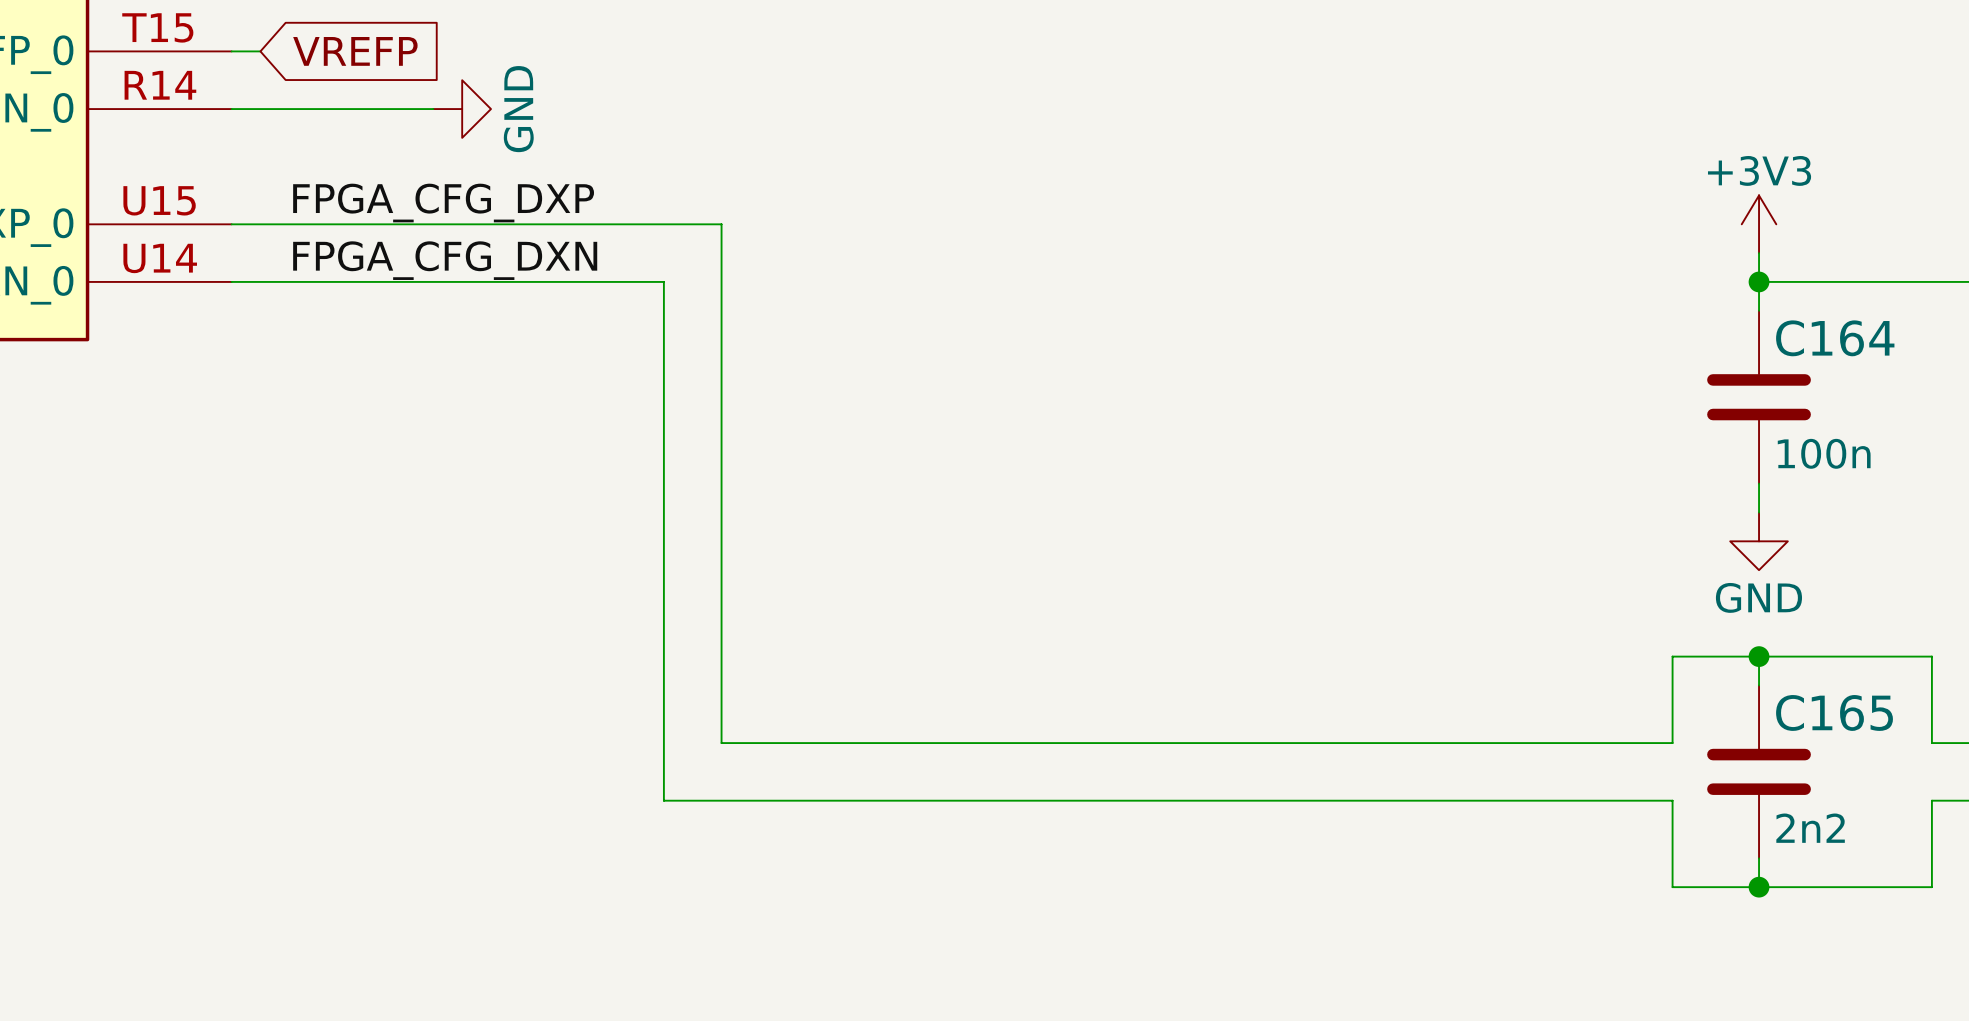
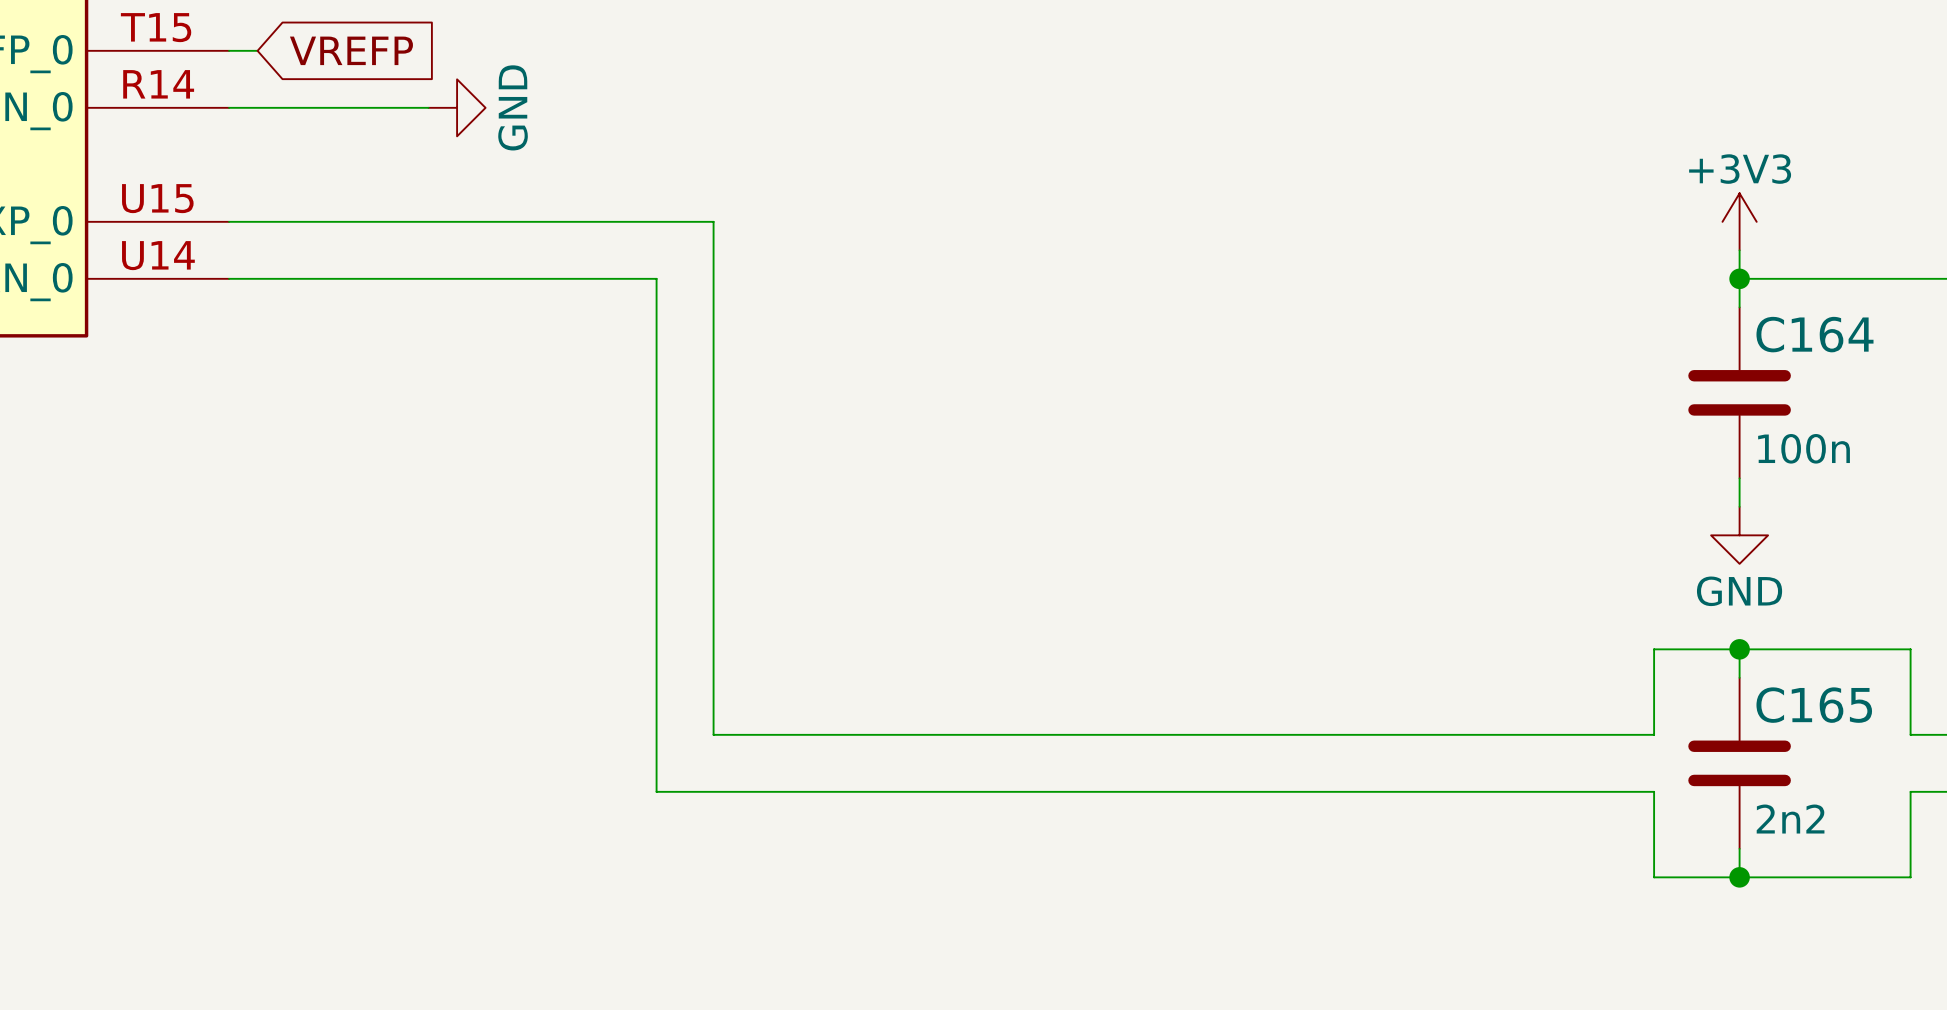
label: FPGA_CFG_DXP (443, 203) -> none
label: FPGA_CFG_DXN (445, 260) -> none

